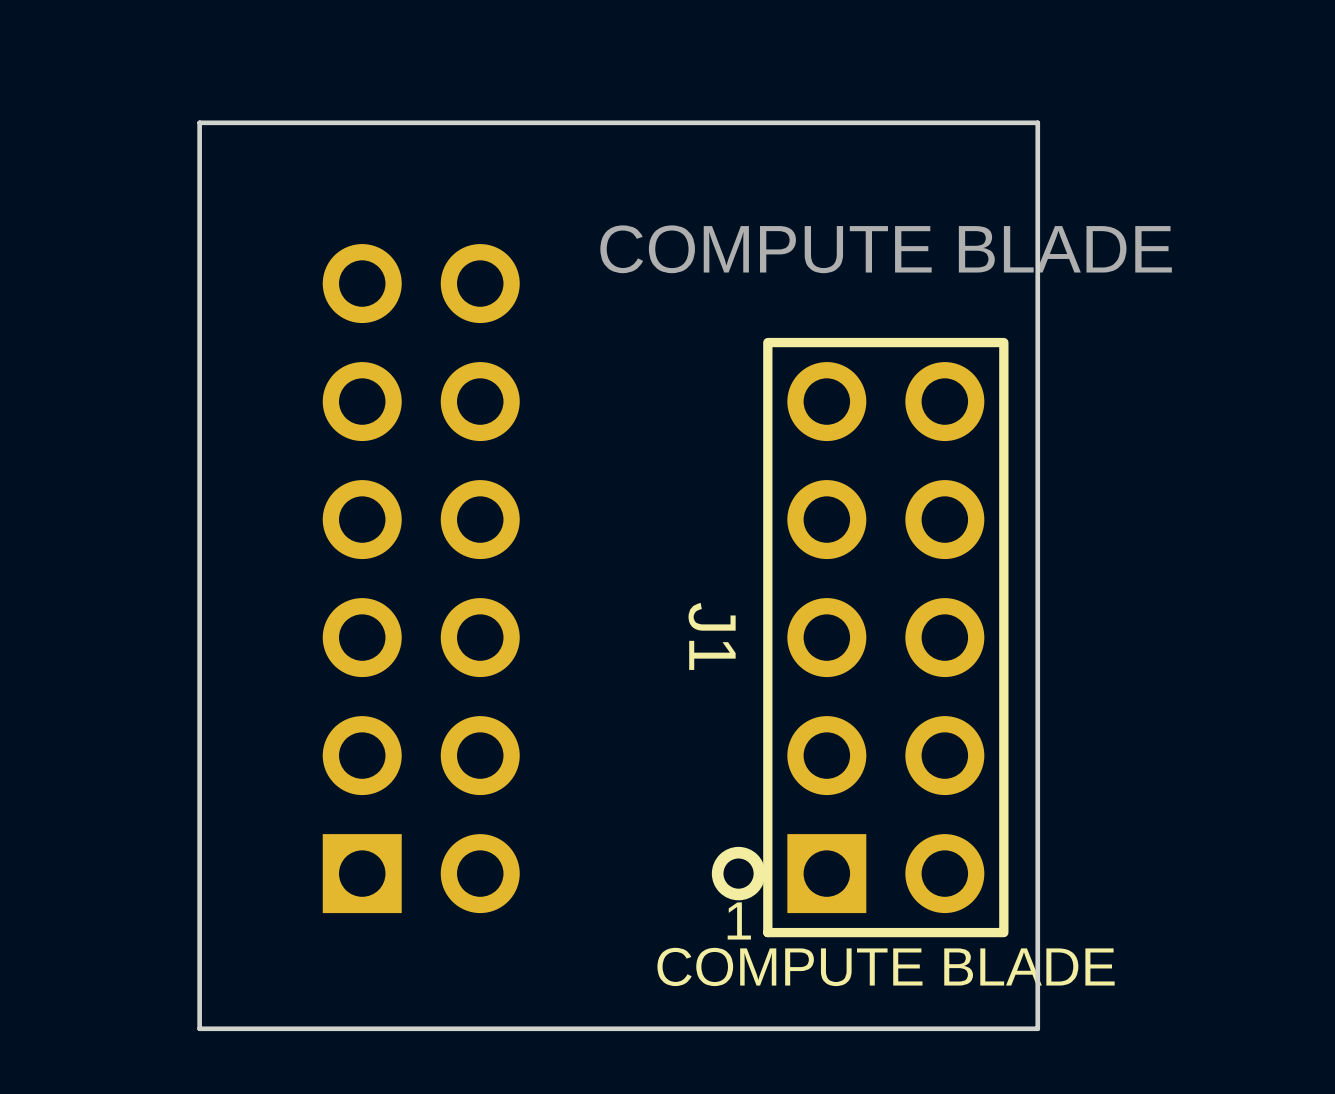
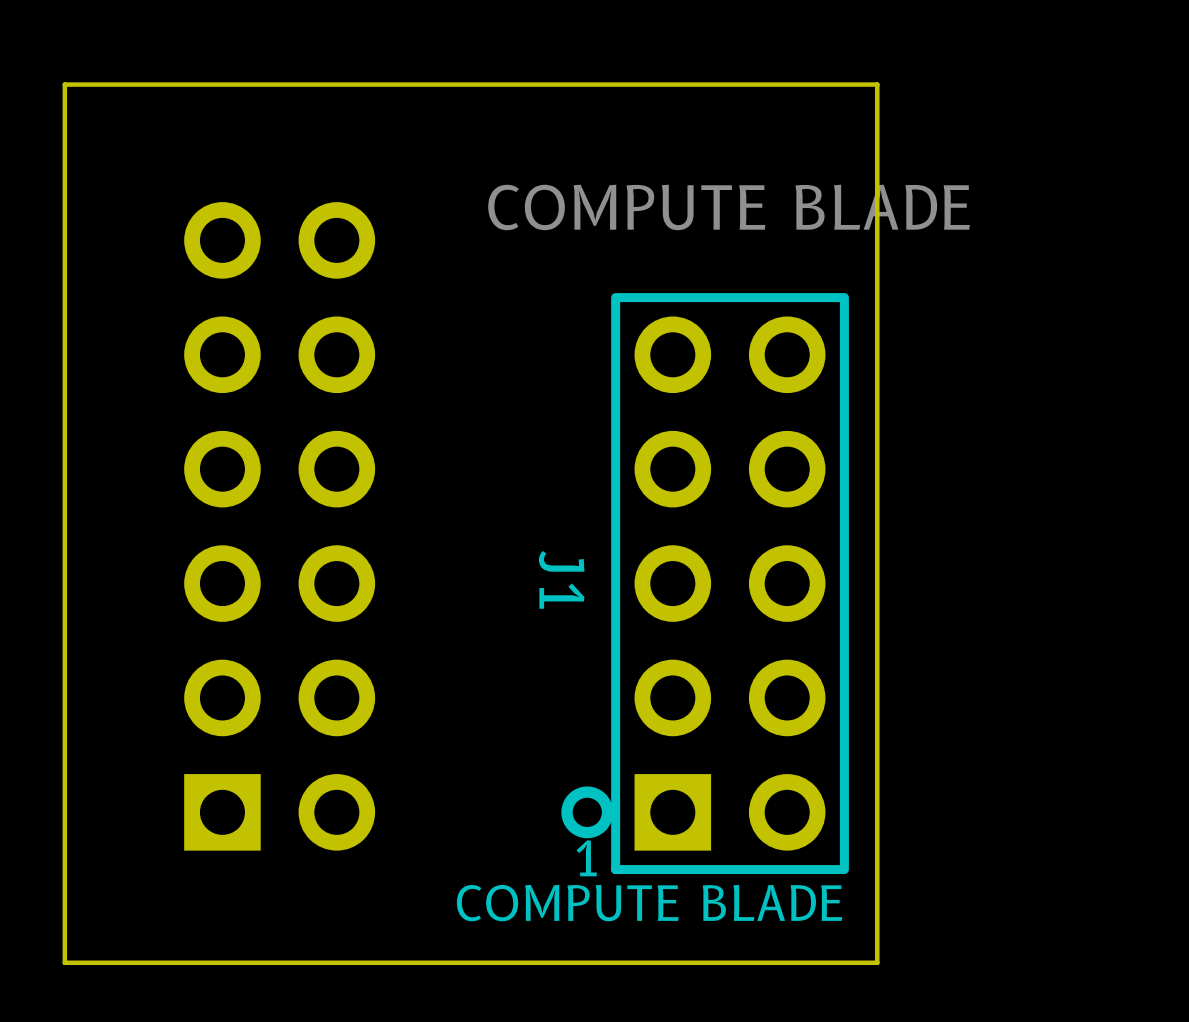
text position: COMPUTE BLADE (886, 966) -> COMPUTE BLADE (649, 903)

